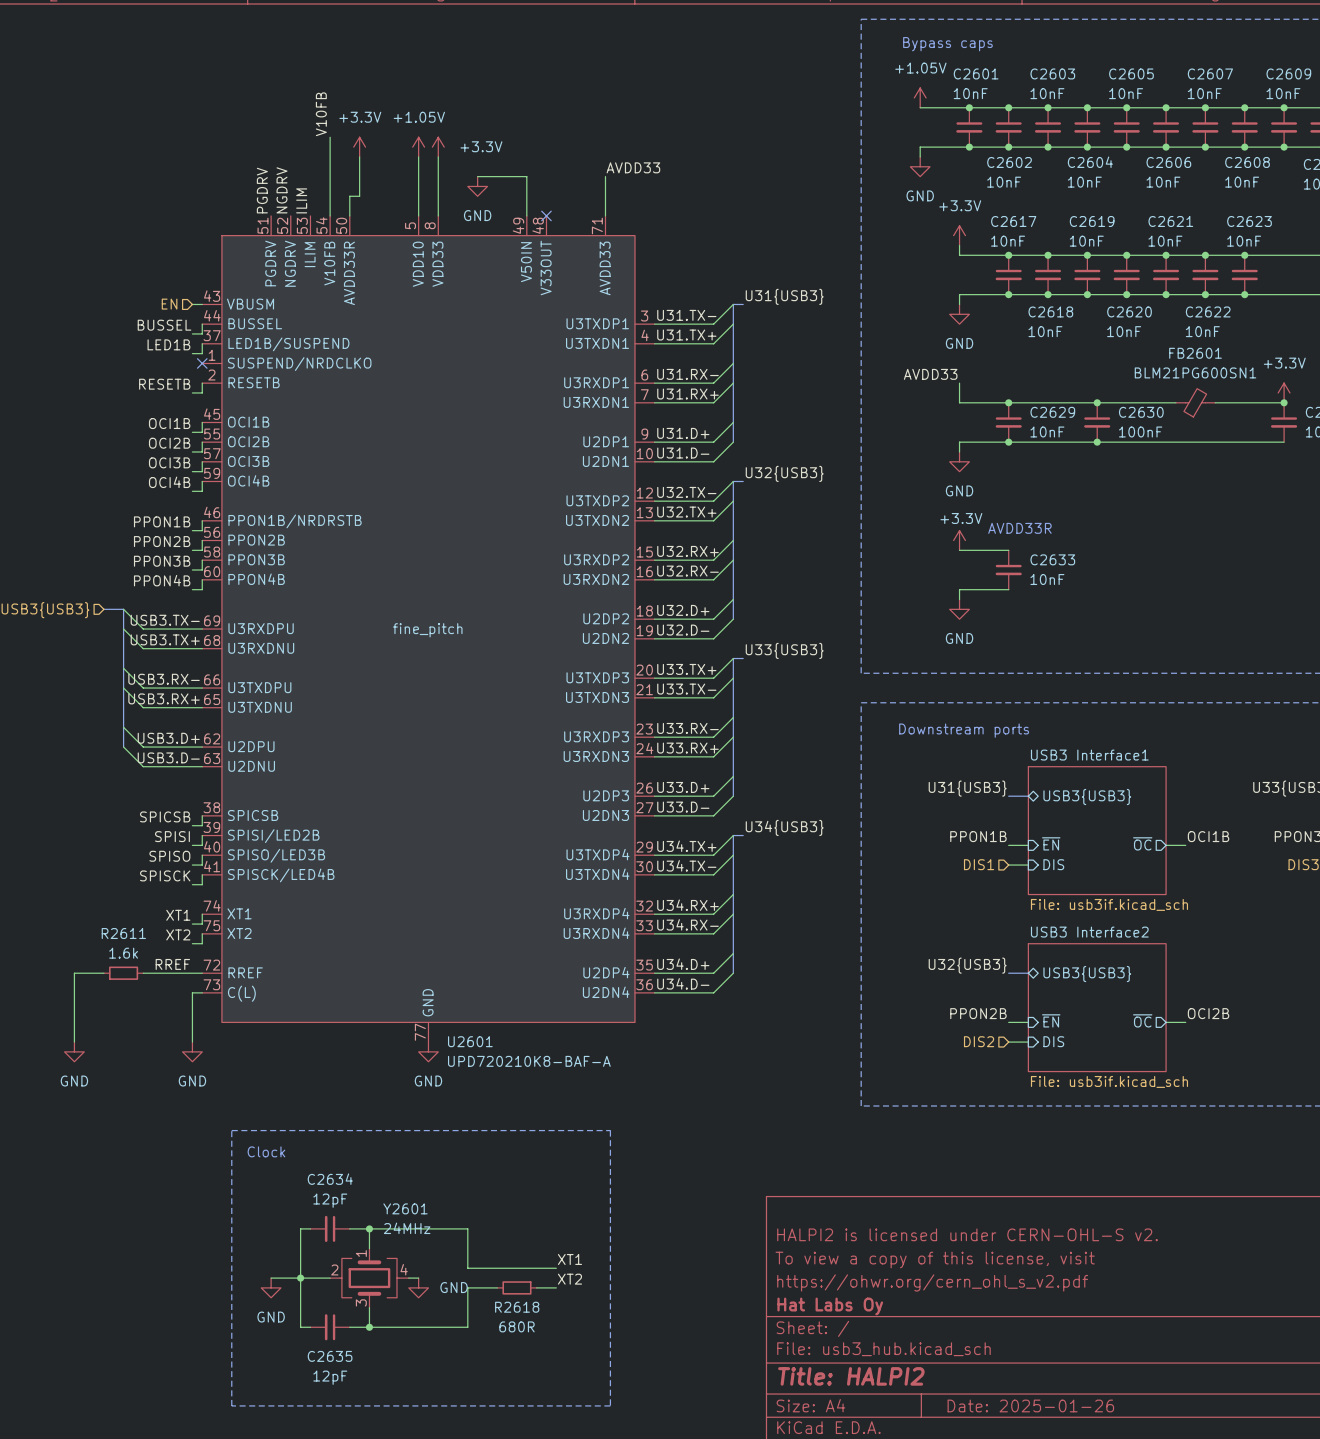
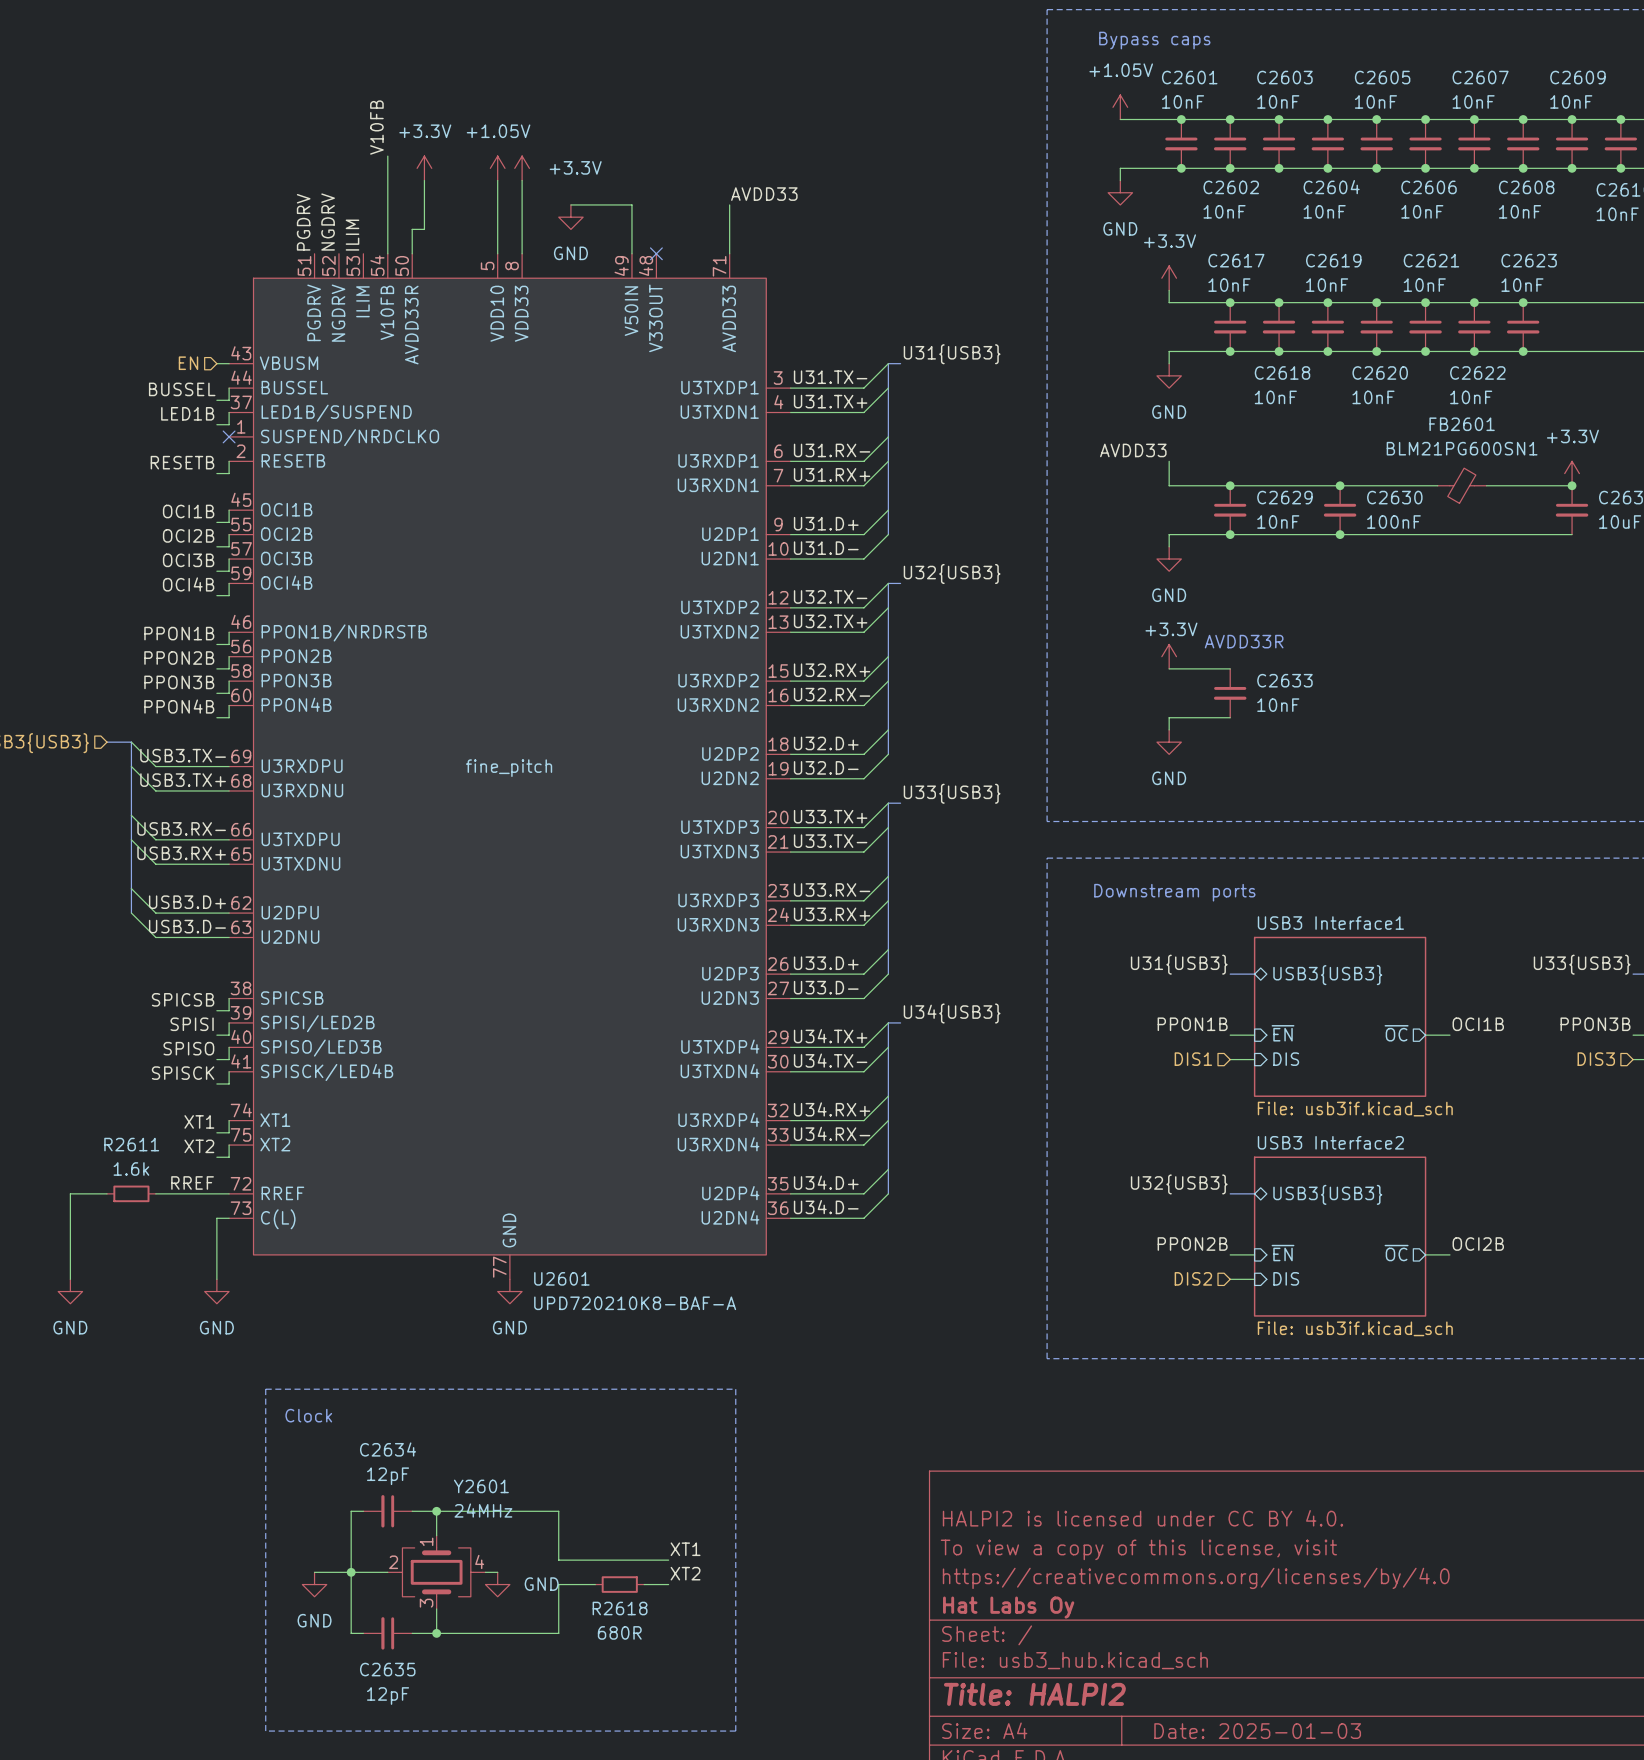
title block: HALPI2 is licensed under CERN-OHL-S v2. (967, 1234) -> HALPI2 is licensed under CC BY 4.0. (1142, 1518)
title block: https://ohwr.org/cern_ohl_s_v2.pdf (932, 1282) -> https://creativecommons.org/licenses/by/4.0 (1196, 1578)
title block: Date: 2025-01-26 (1030, 1405) -> Date: 2025-01-03 (1257, 1731)

